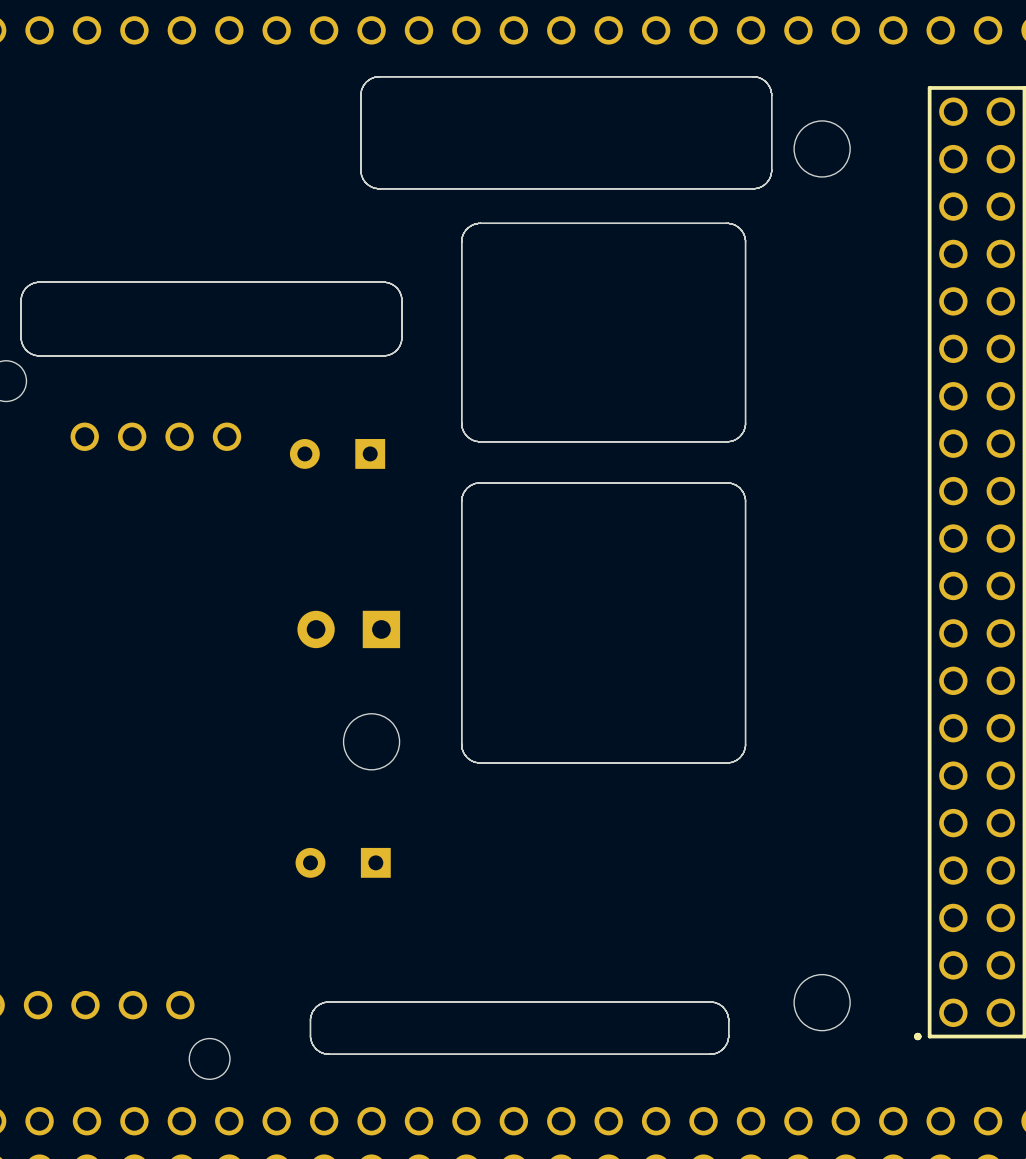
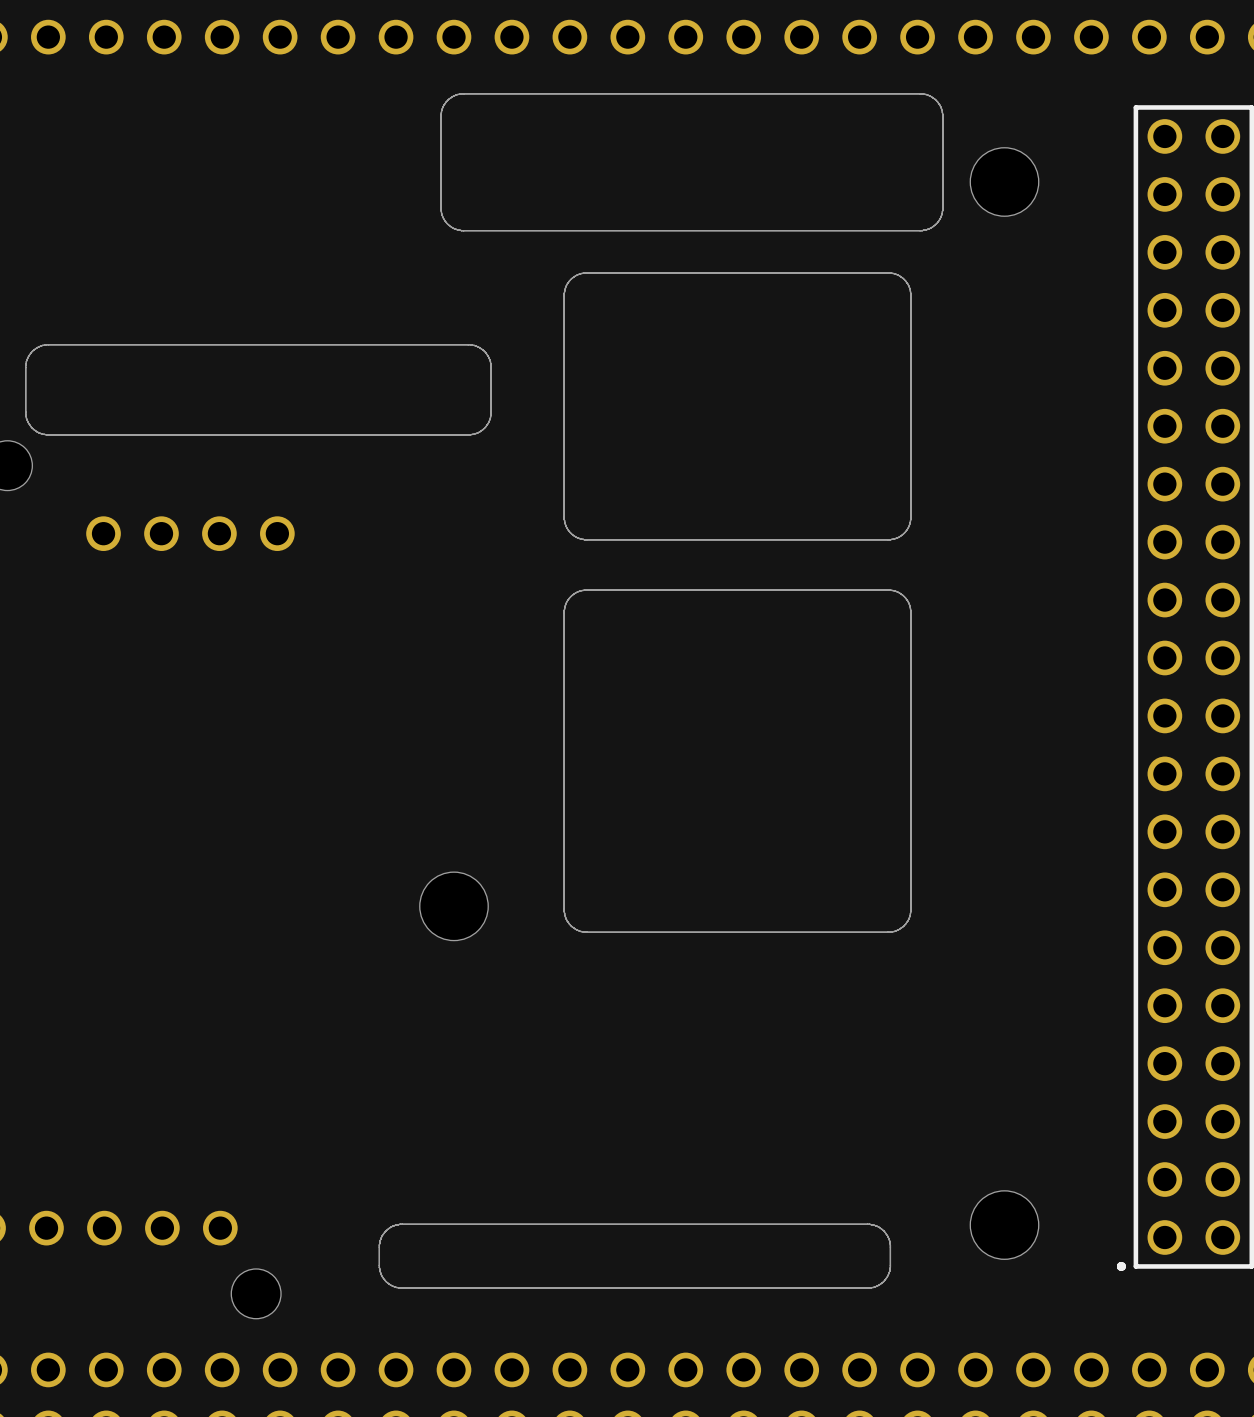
part: (337, 453) -> none
part: (348, 629) -> none
part: (343, 862) -> none

